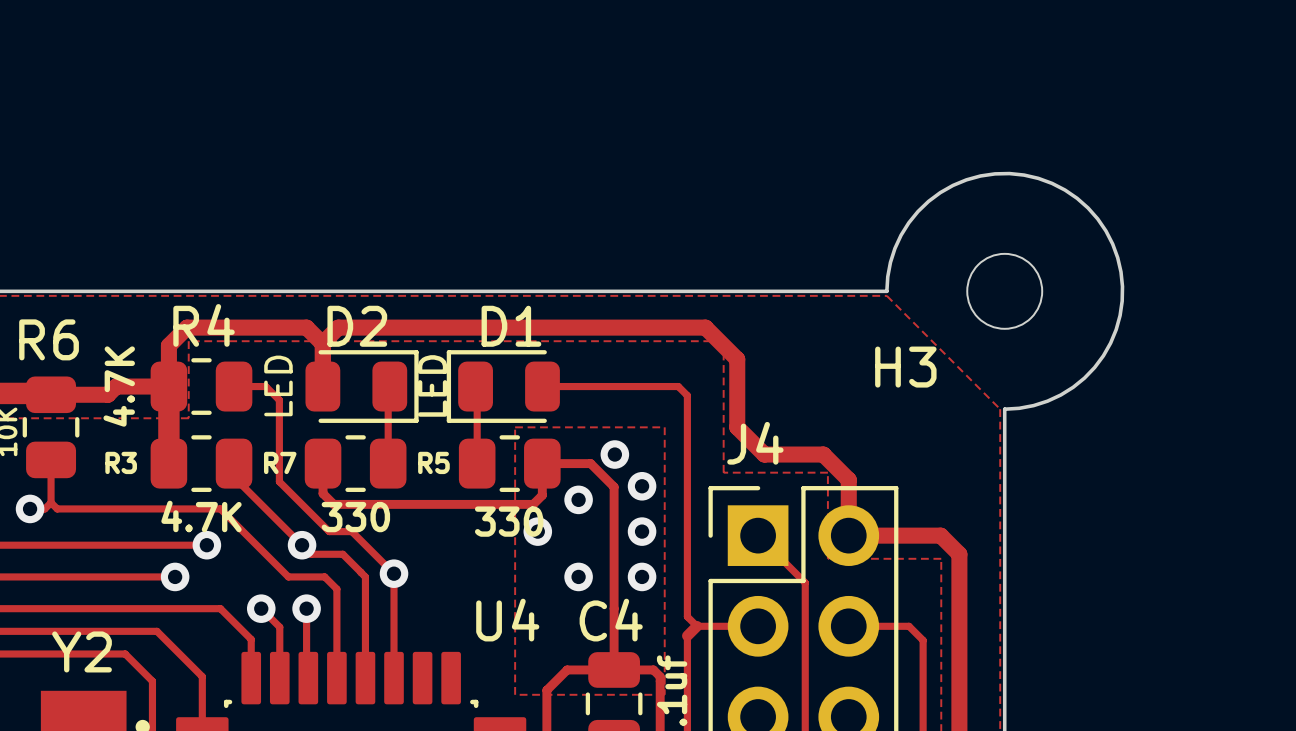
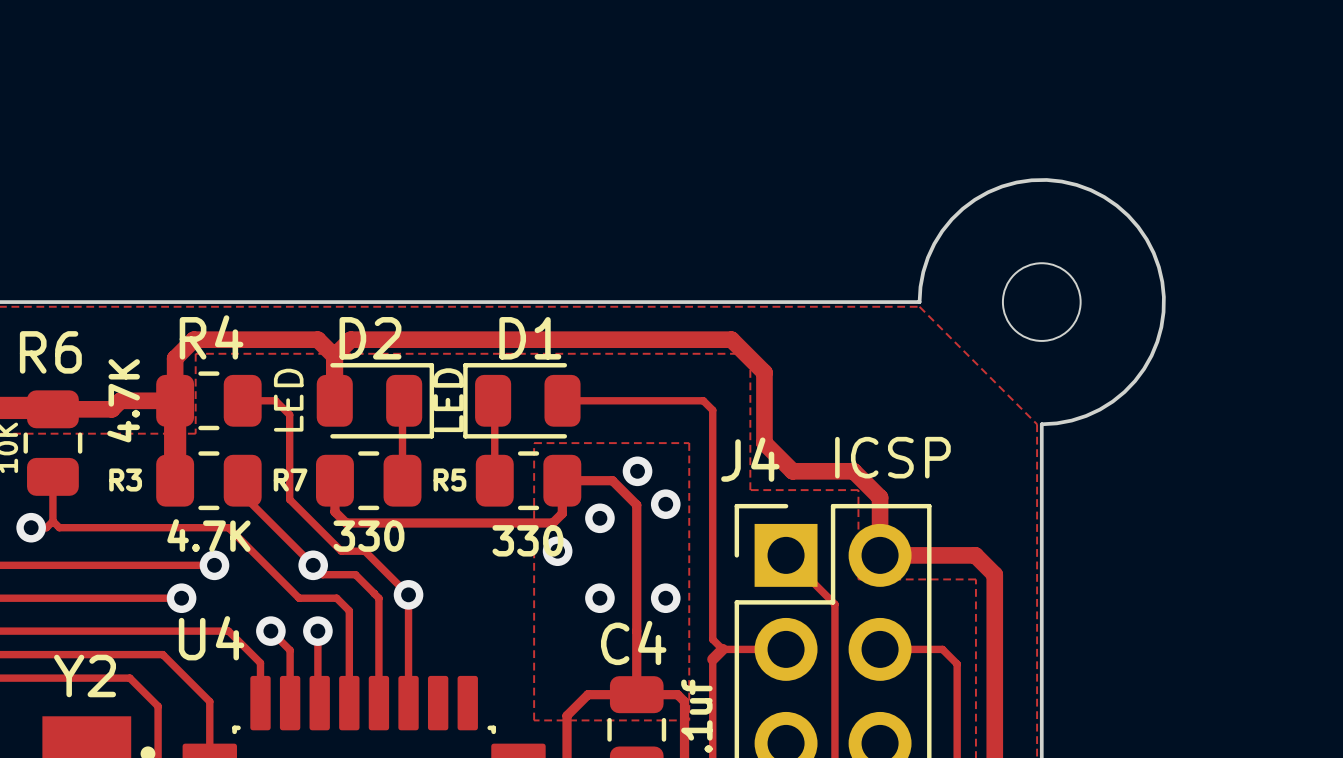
H3 name: H3 (905, 367) -> none
text: none -> ICSP (892, 457)
J4 name position: J4 (755, 443) -> J4 (750, 459)
via: (642, 531) -> none
U4 name position: U4 (507, 620) -> U4 (211, 638)

